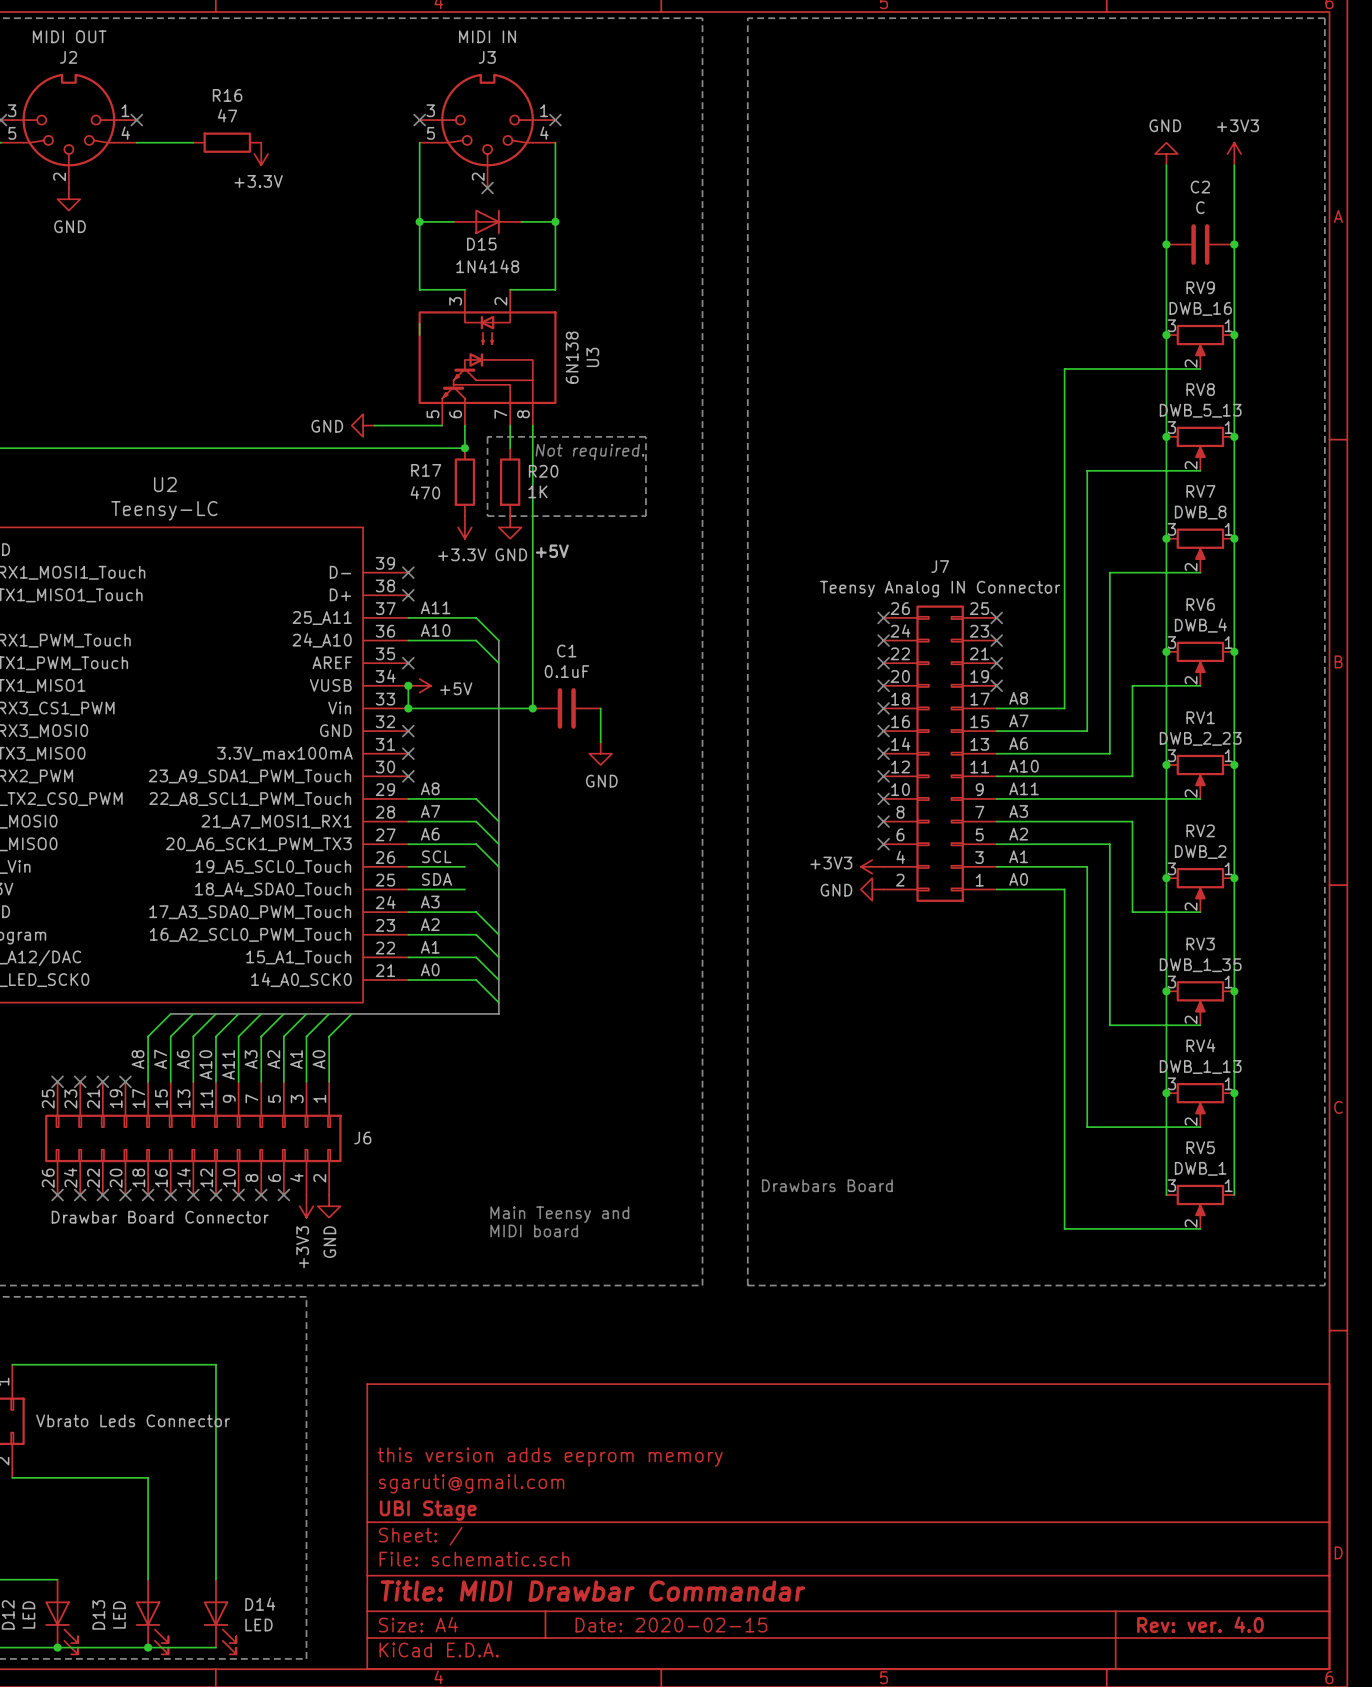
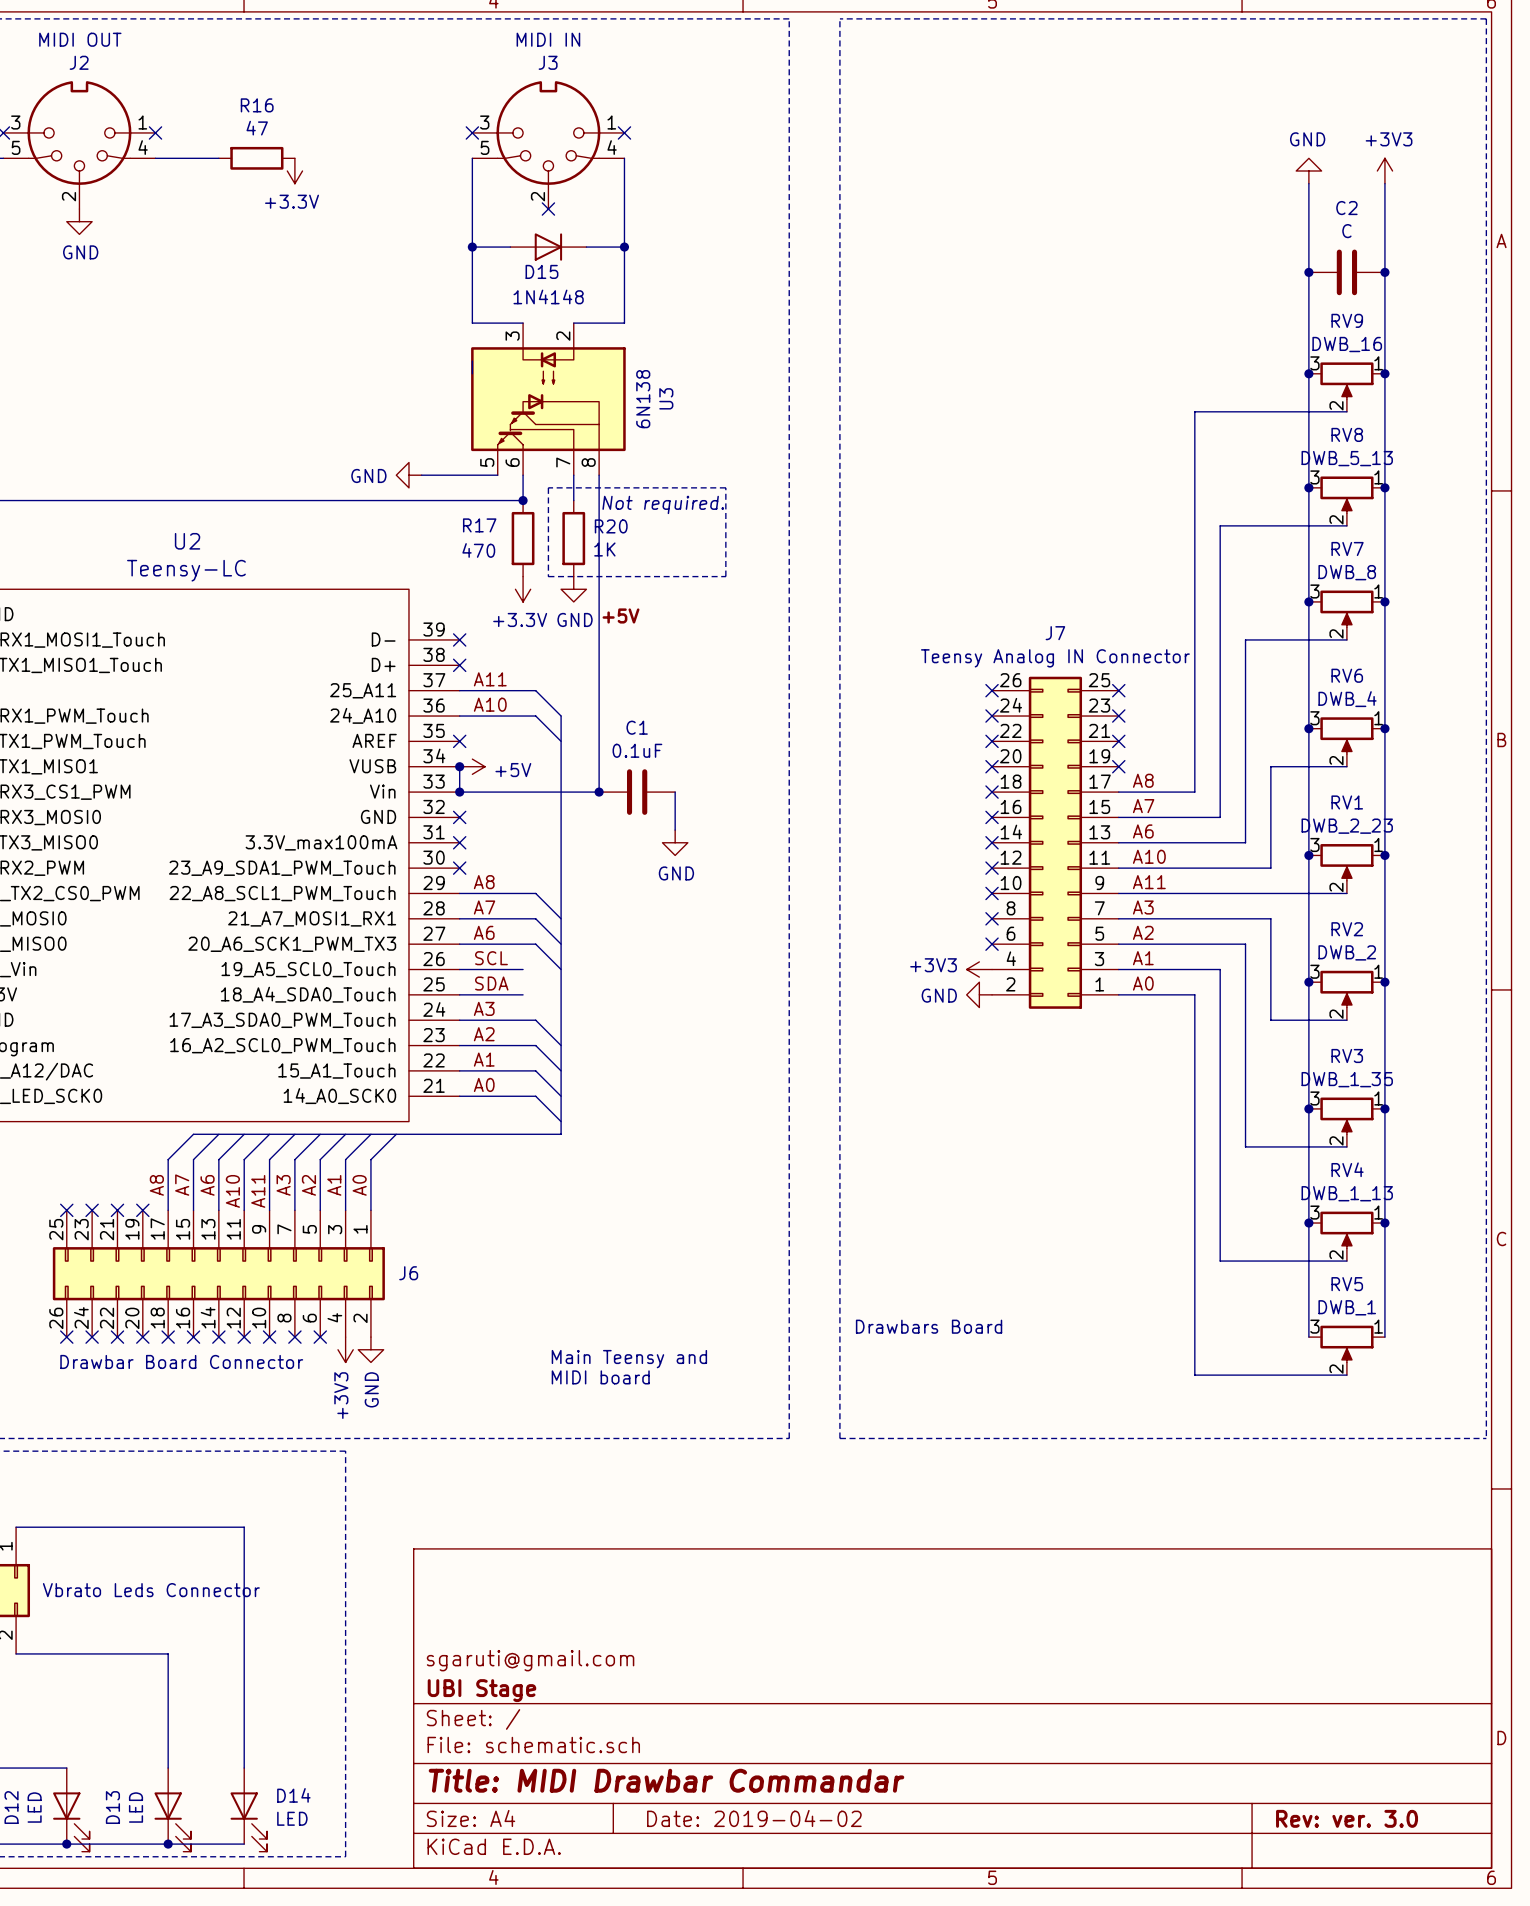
title block: this version adds eeprom memory (550, 1457) -> none
title block: Rev: ver. 4.0 (1200, 1624) -> Rev: ver. 3.0 (1347, 1818)
title block: Date: 2020-02-15 (671, 1625) -> Date: 2019-04-02 (754, 1818)

